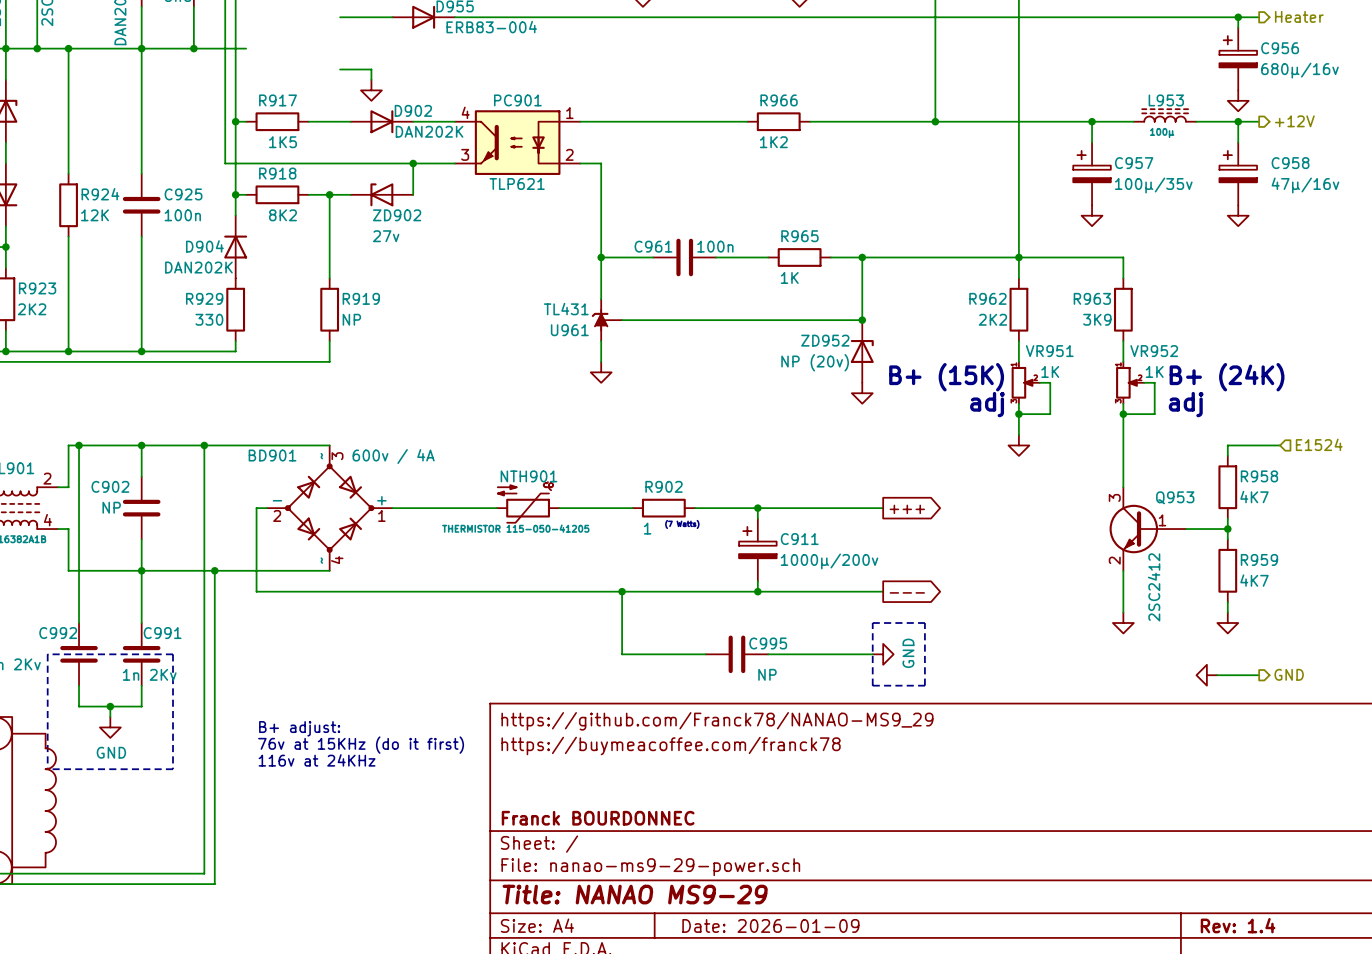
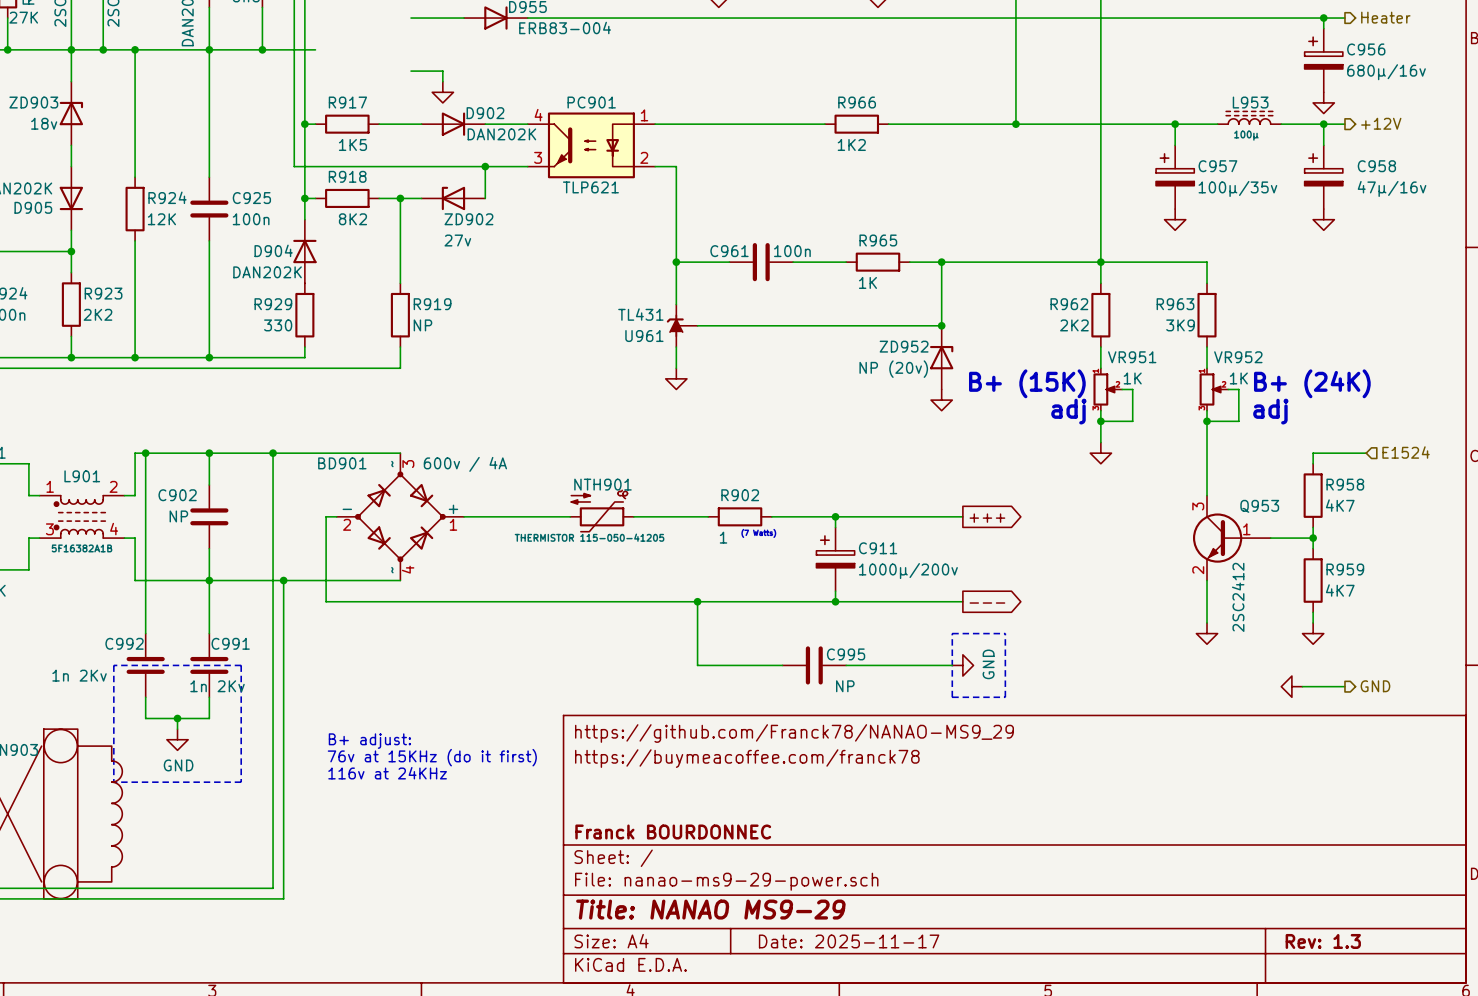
title block: Date: 2026-01-09 (770, 925) -> Date: 2025-11-17 (849, 941)
title block: Rev: 1.4 (1238, 925) -> Rev: 1.3 (1323, 941)

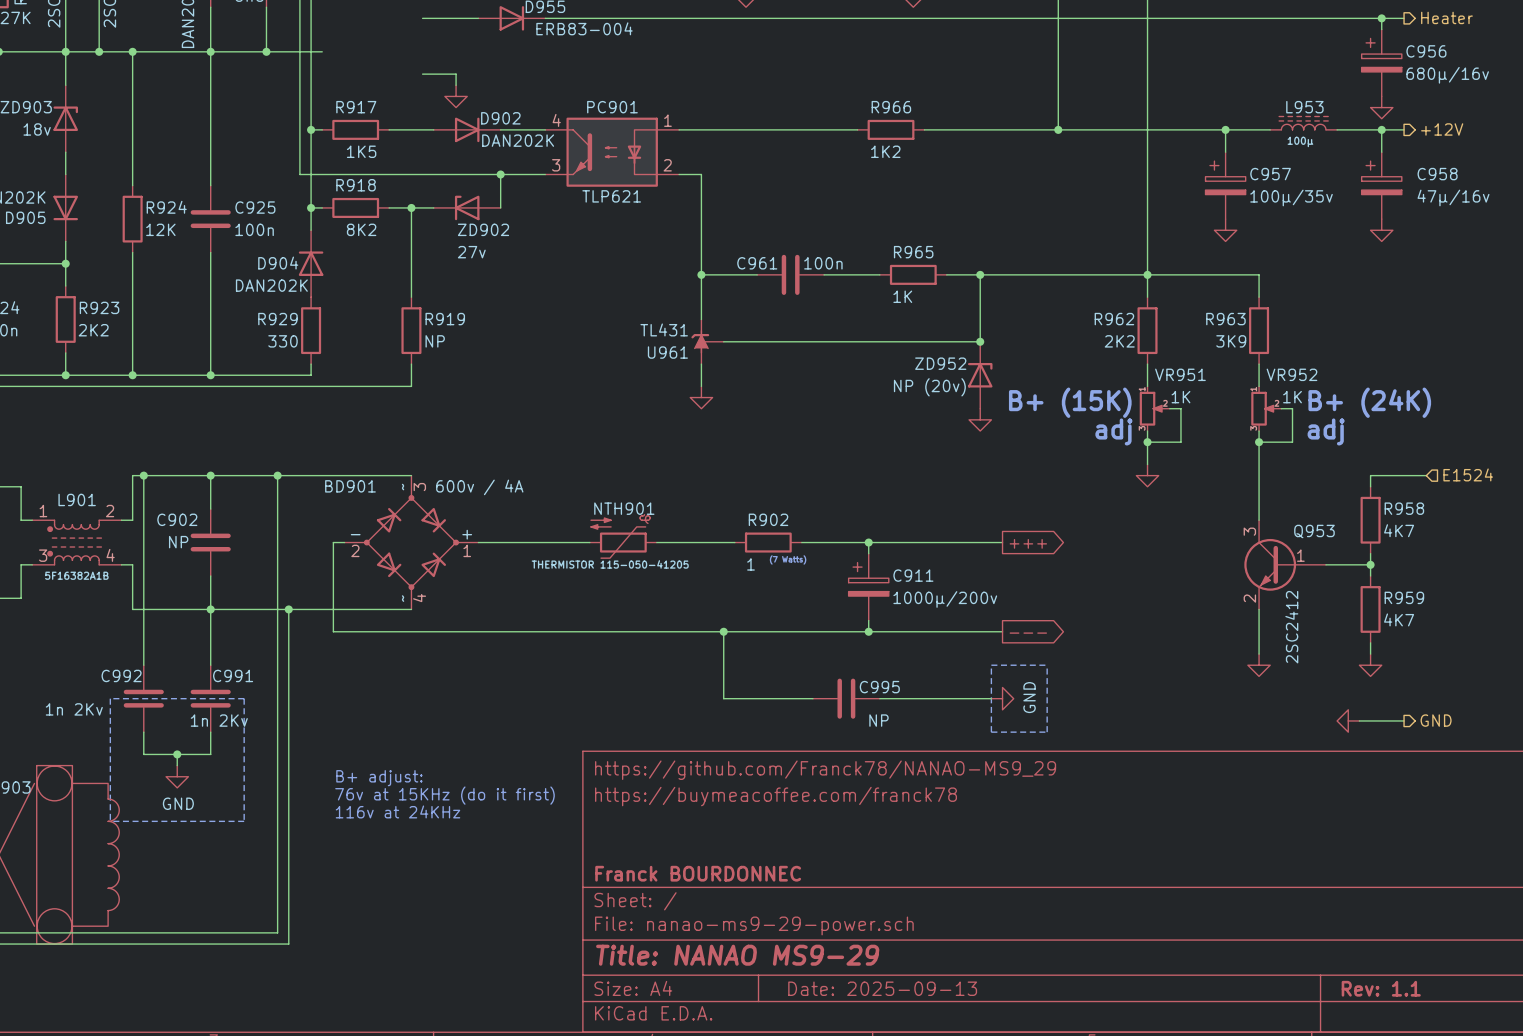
title block: Date: 2025-11-17 (849, 941) -> Date: 2025-09-13 (882, 988)
title block: Rev: 1.3 (1323, 941) -> Rev: 1.1 (1381, 988)

